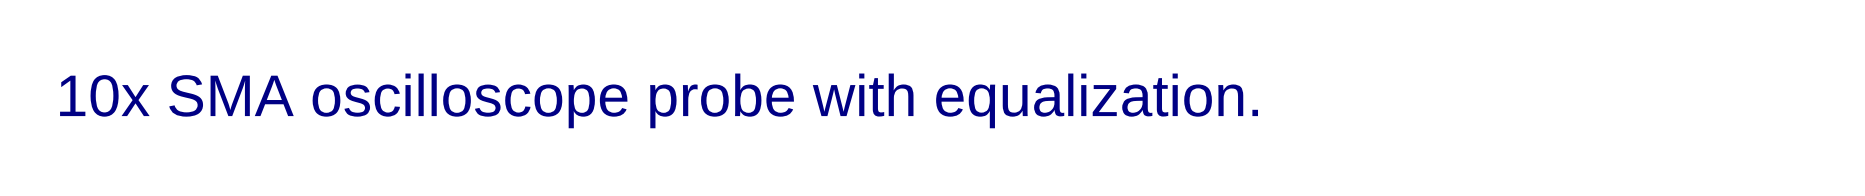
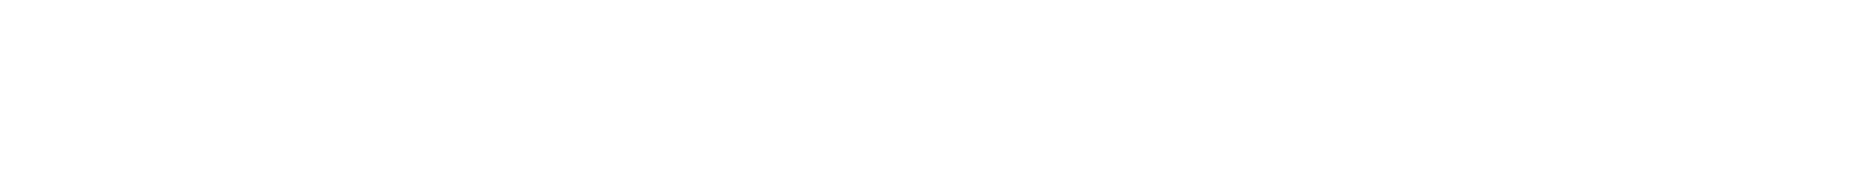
text: 10x SMA oscilloscope probe with equalization. (659, 100) -> none

